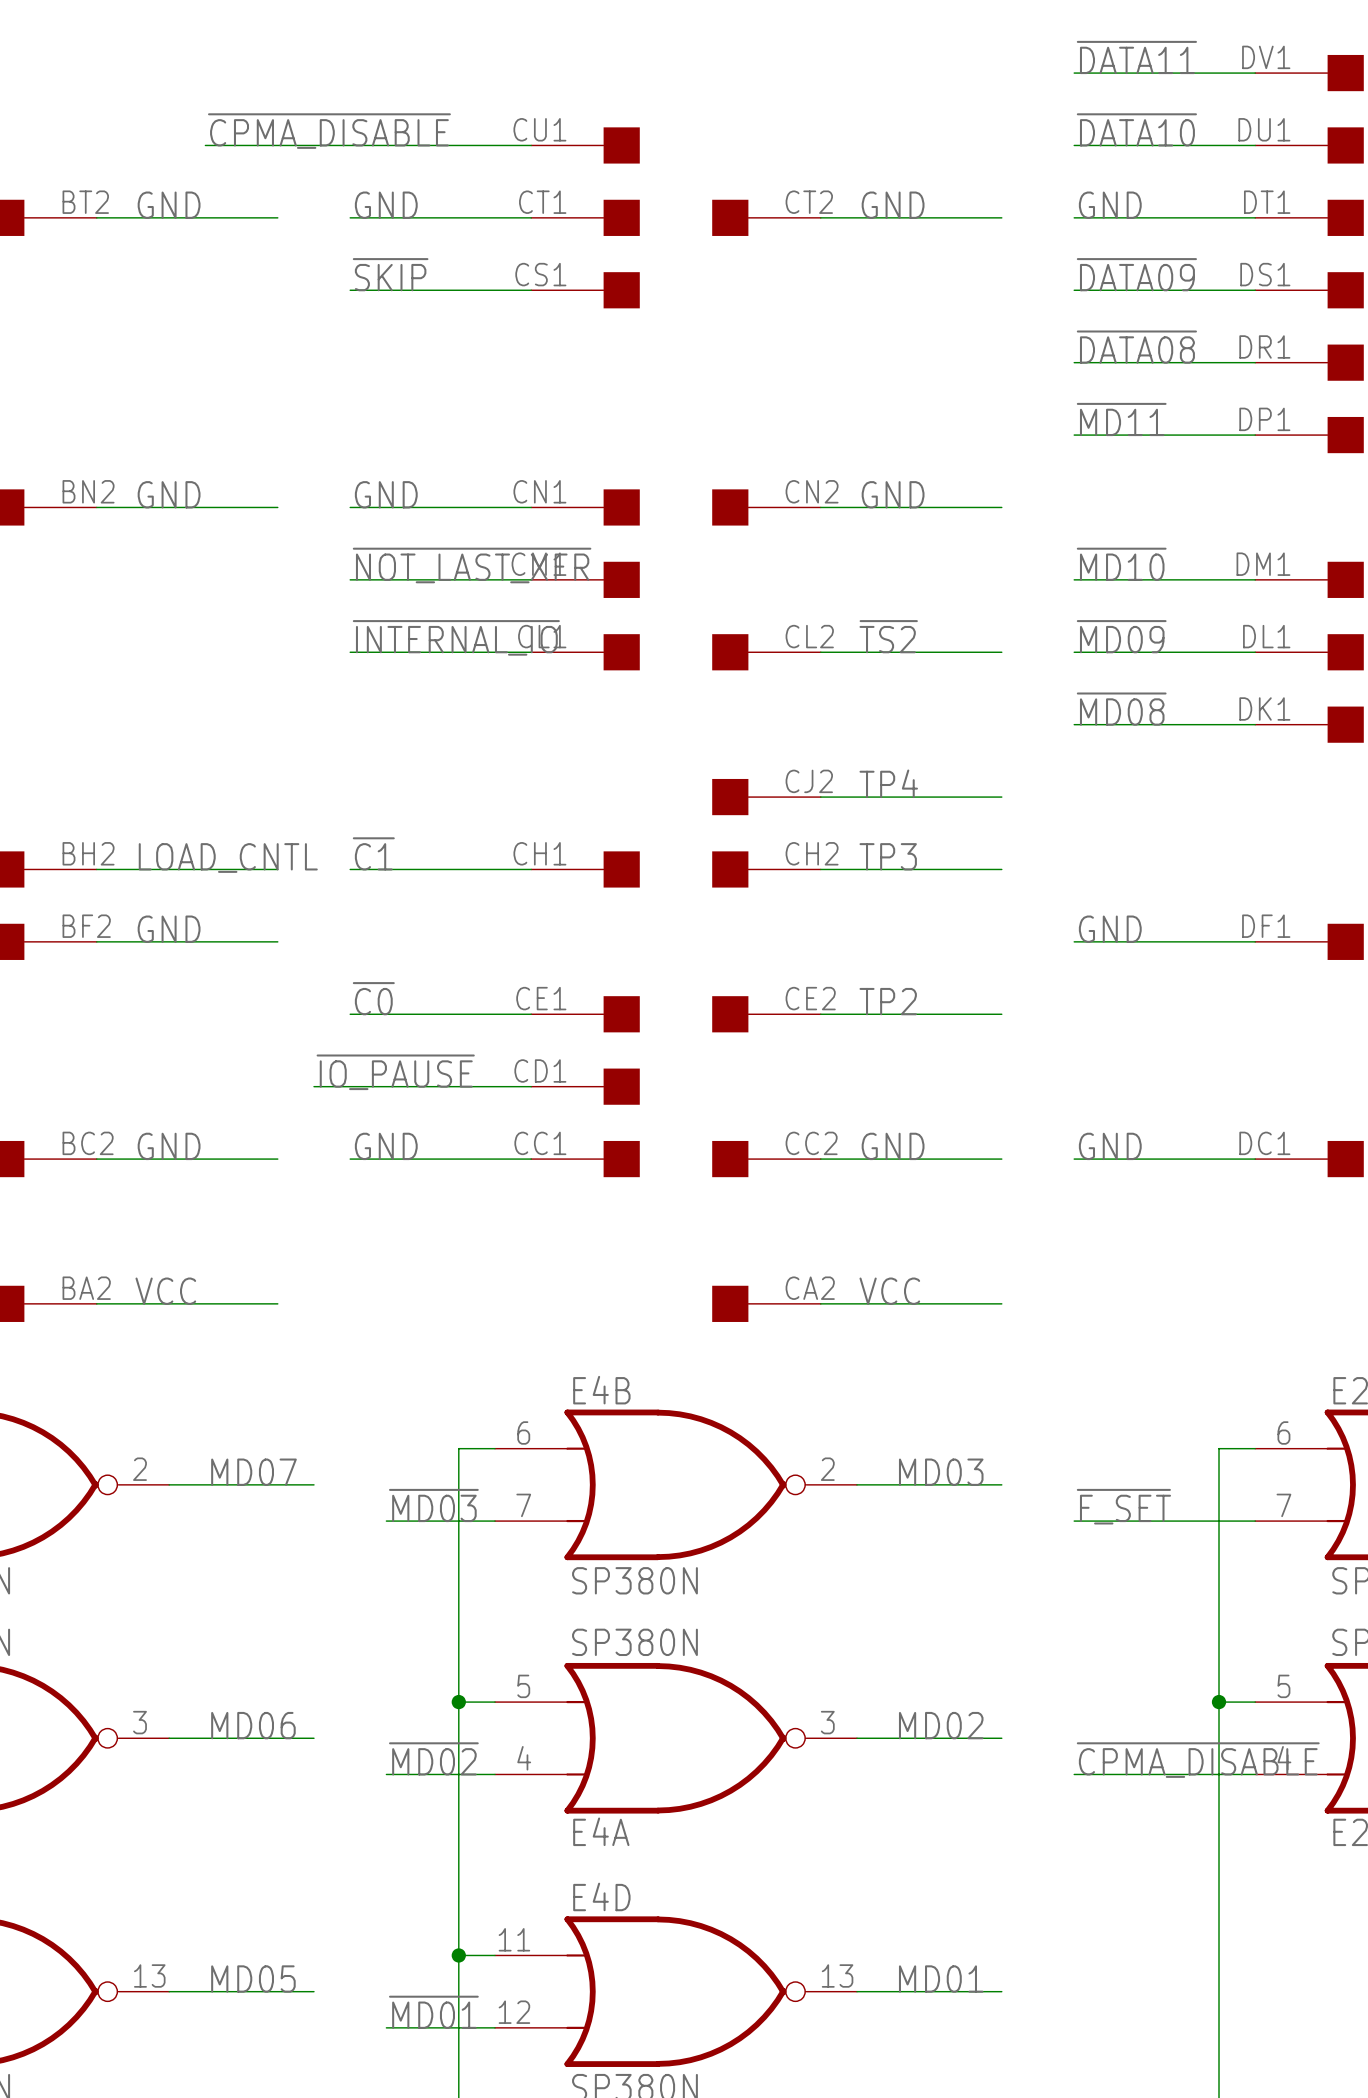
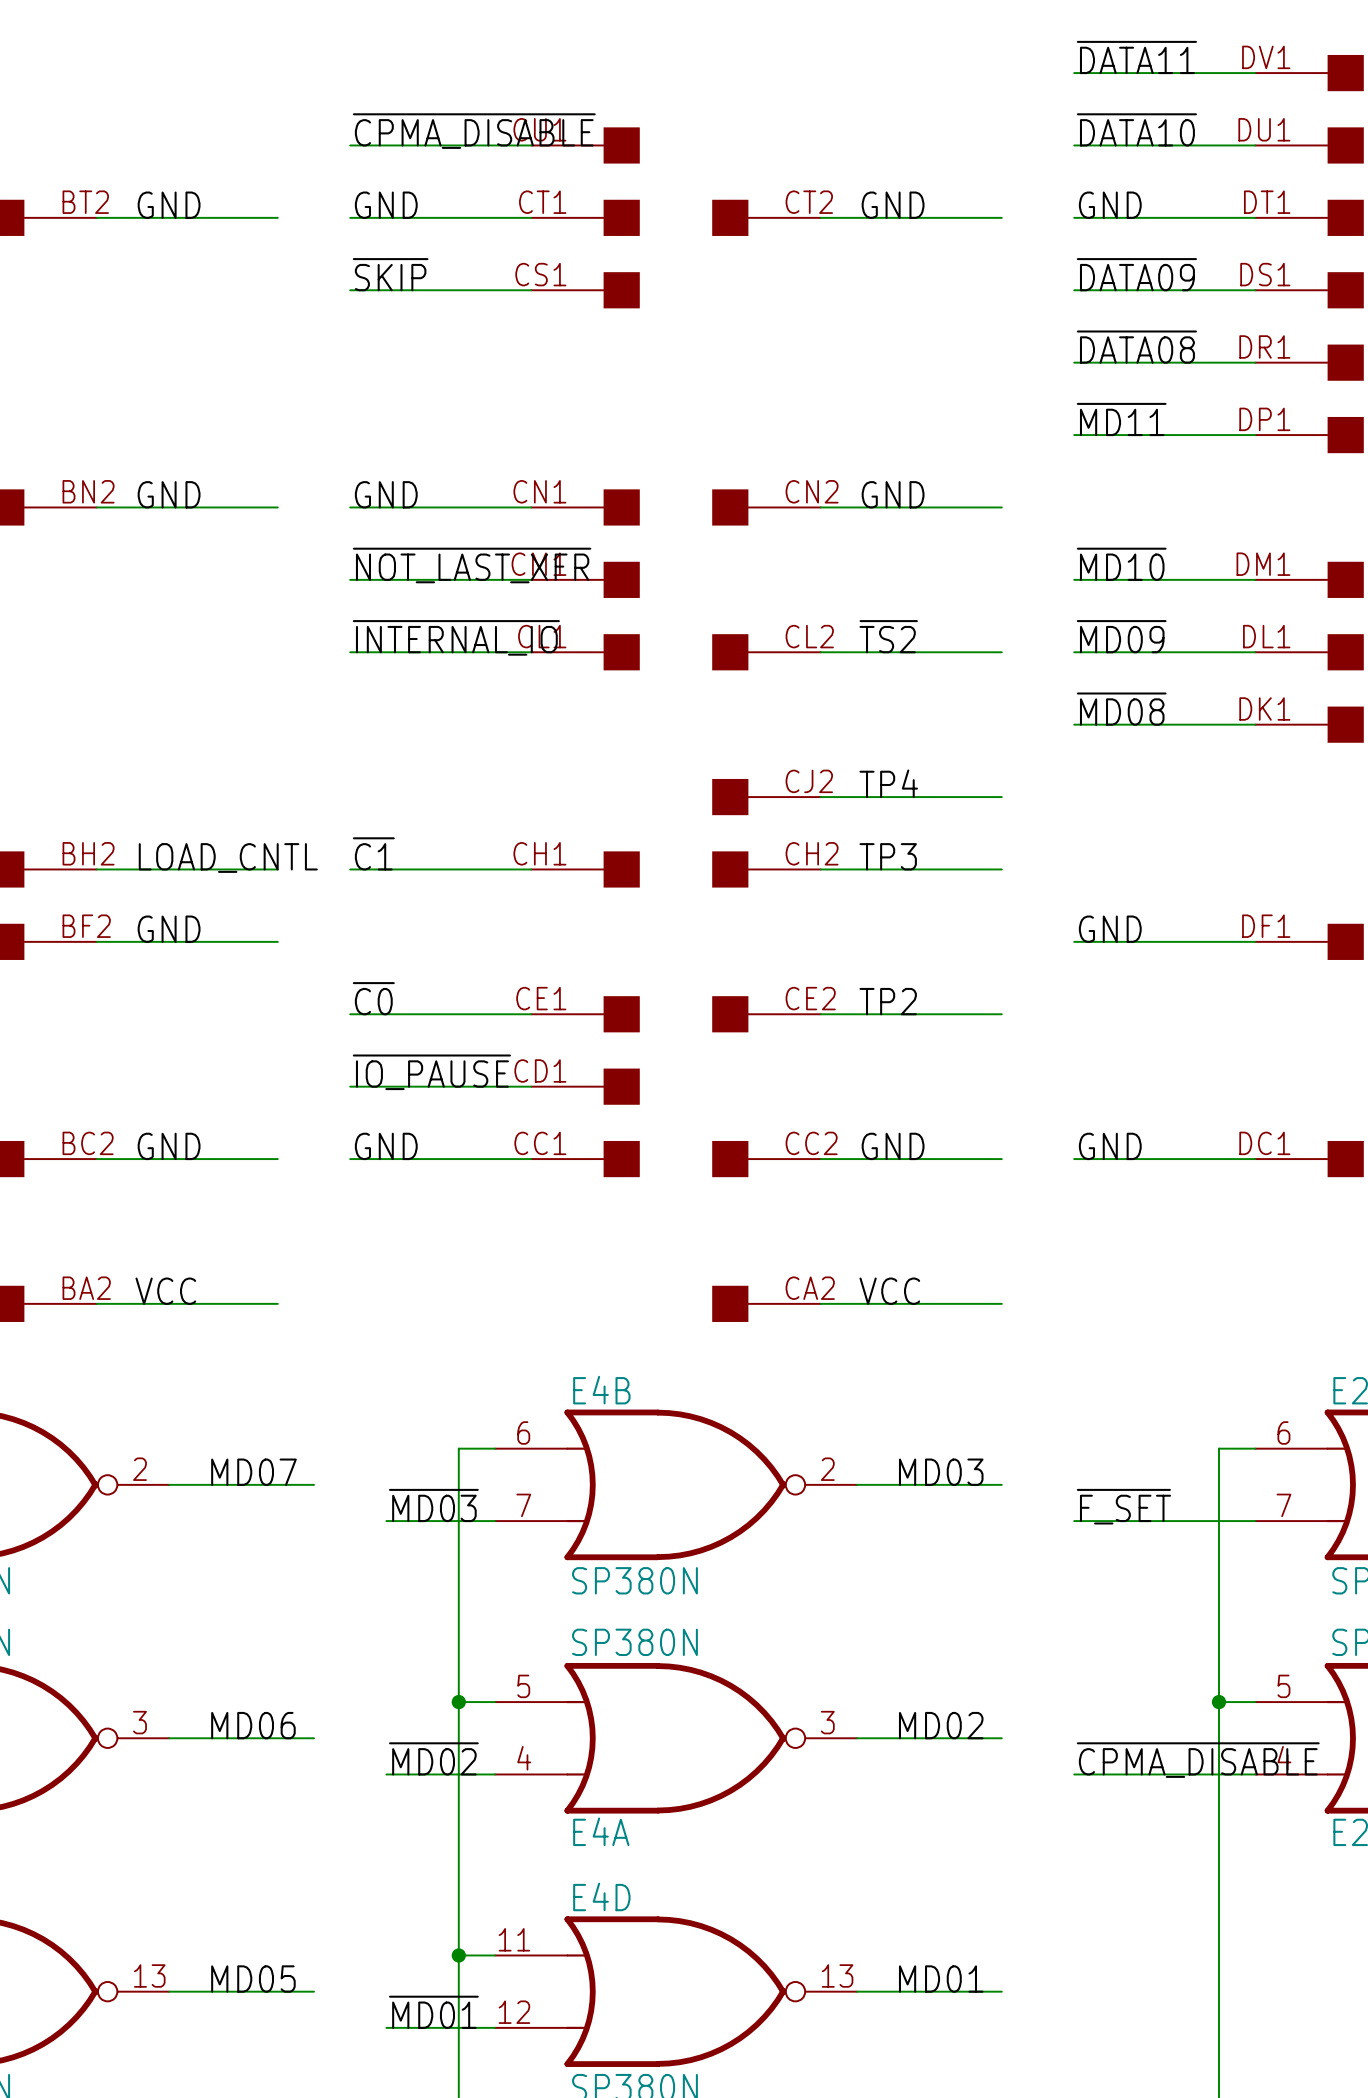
label position: ~{CPMA_DISABLE} (329, 131) -> ~{CPMA_DISABLE} (474, 131)
wire: (205, 145) (350, 145) -> none
label position: ~{IO_PAUSE} (395, 1072) -> ~{IO_PAUSE} (431, 1072)
wire: (313, 1086) (350, 1086) -> none

